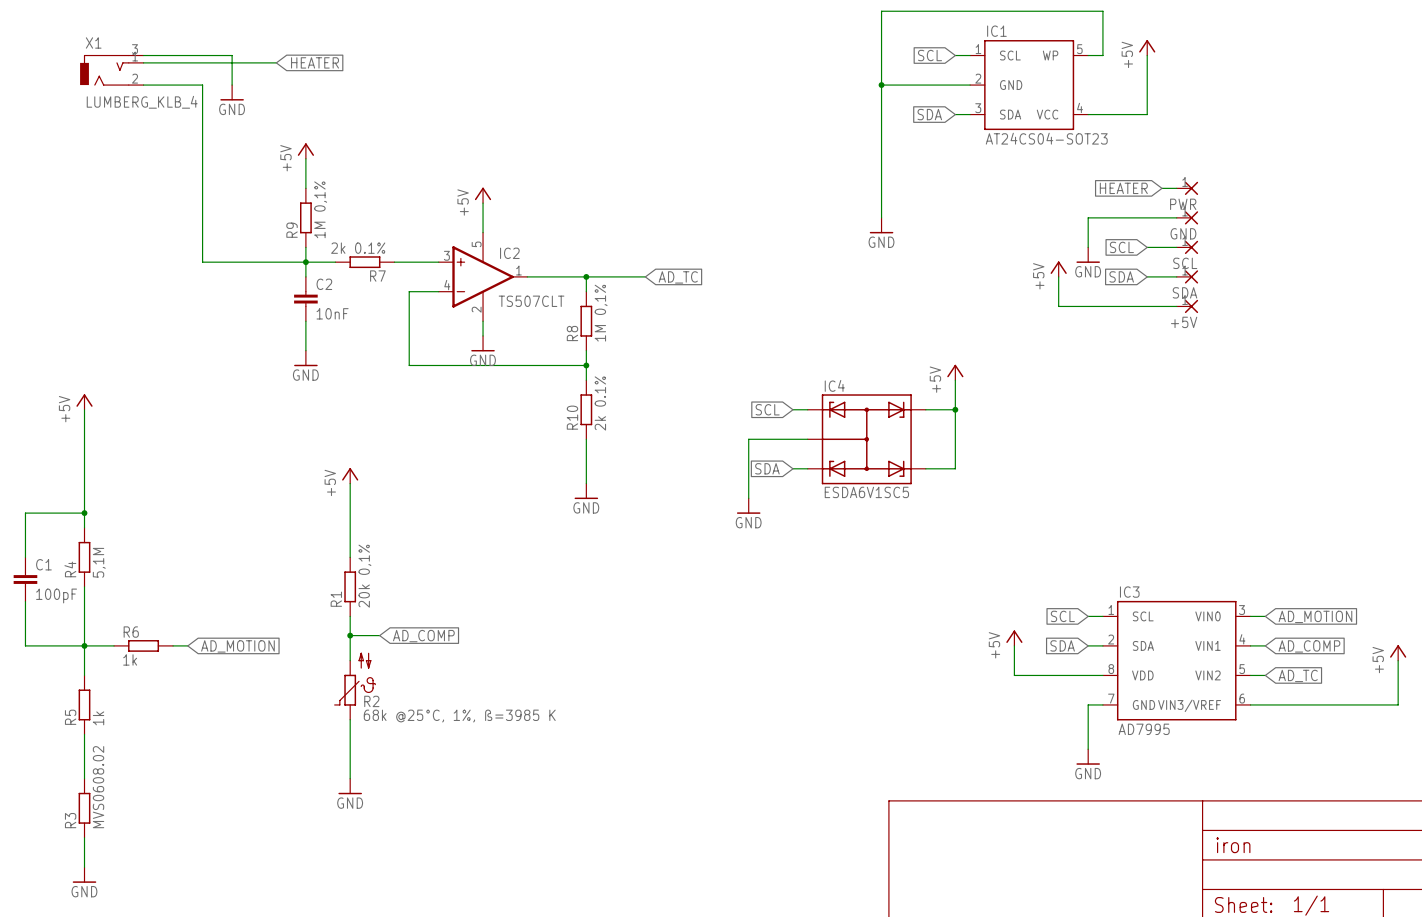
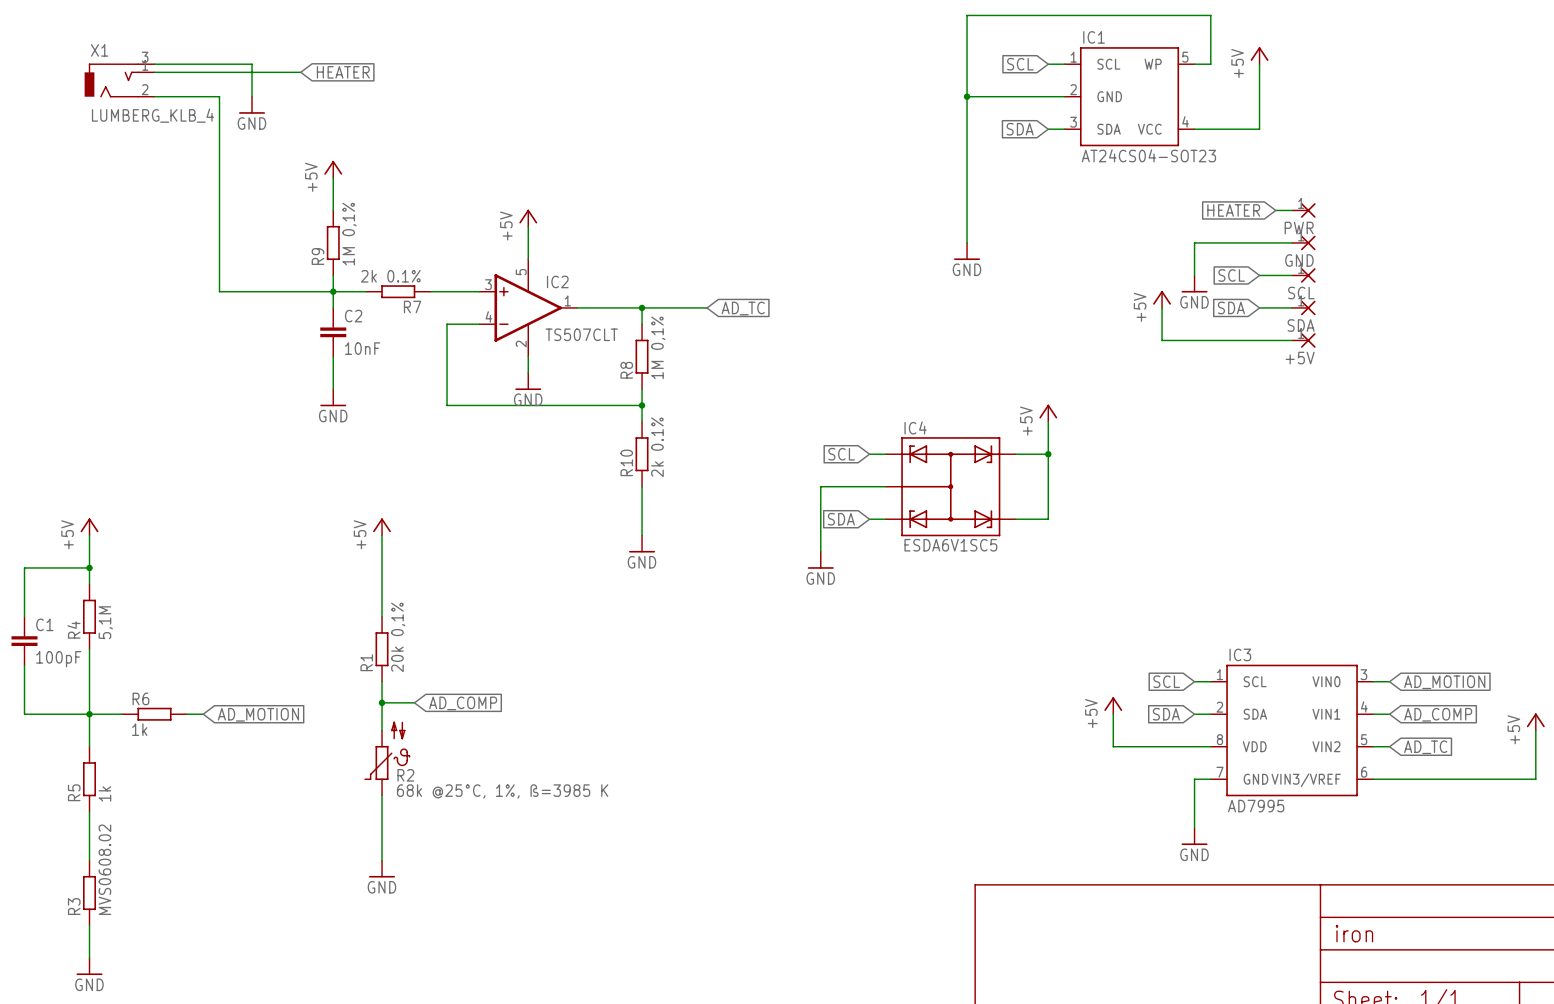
power symbol position: +5V (84, 402) -> +5V (89, 526)
wire: (84, 409) (84, 483) -> none

